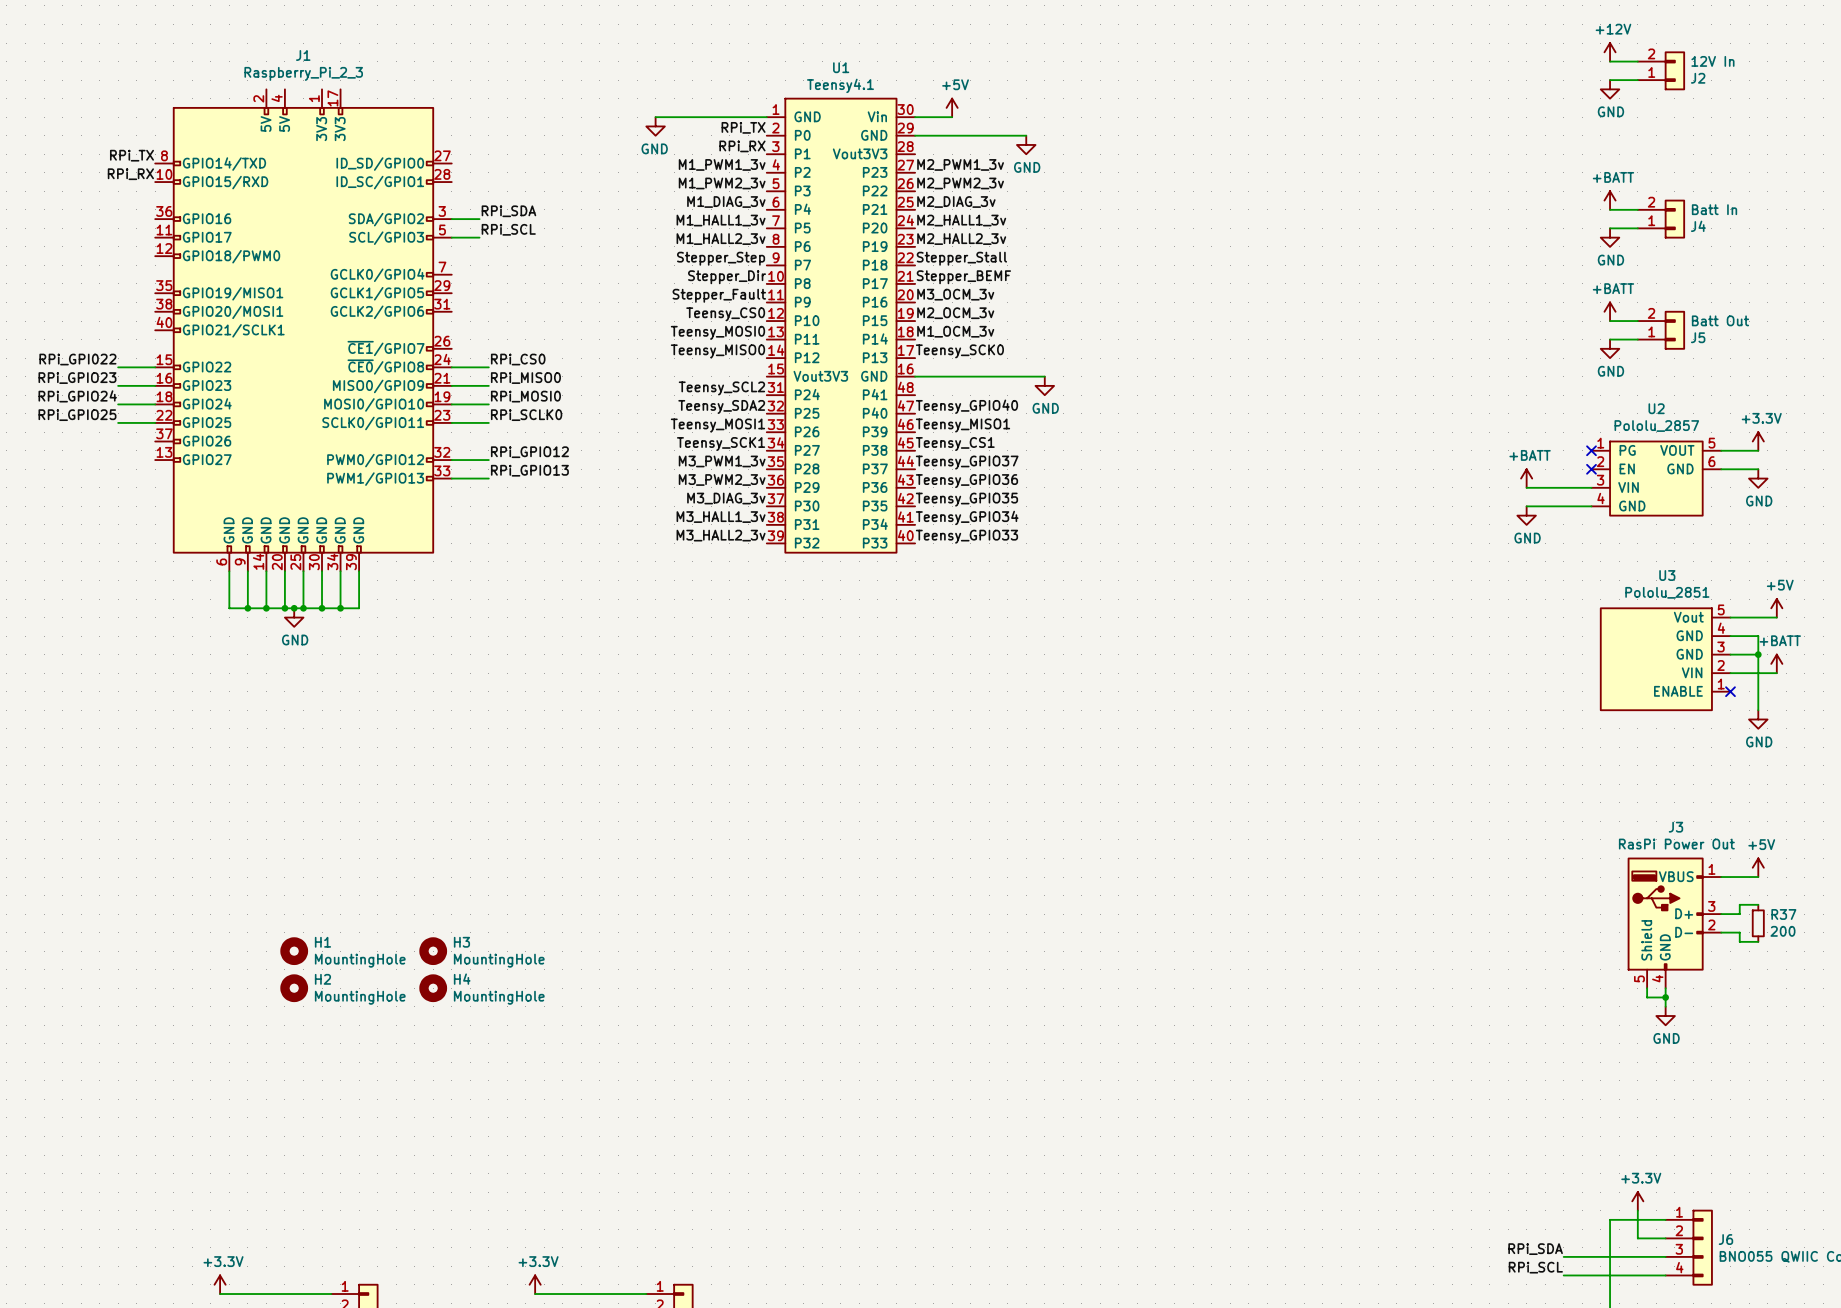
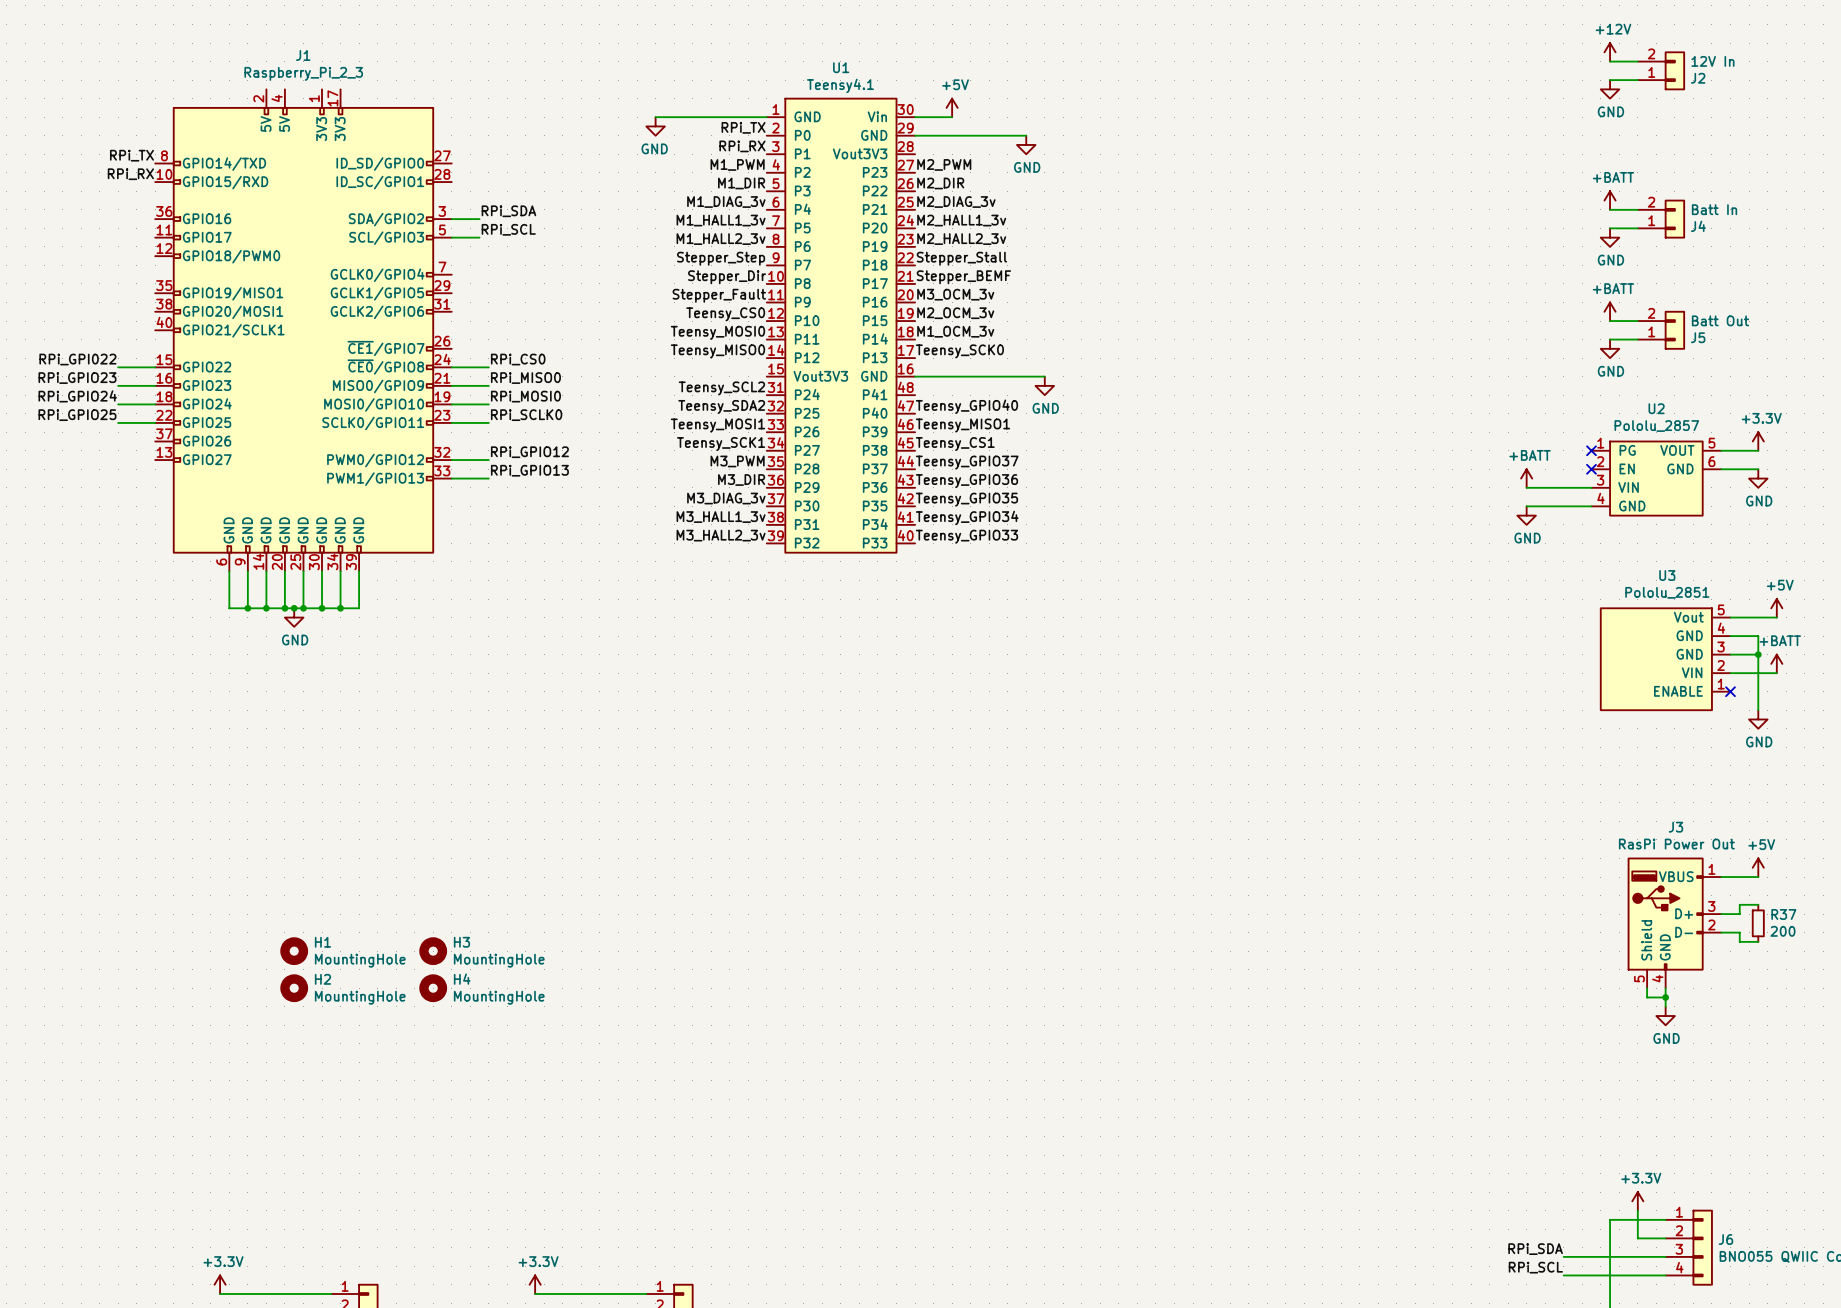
label: M1_PWM1_3v (722, 164) -> M1_PWM (737, 164)
label: M2_PWM1_3v (960, 164) -> M2_PWM (944, 164)
label: M1_PWM2_3v (722, 183) -> M1_DIR (741, 183)
label: M2_PWM2_3v (960, 183) -> M2_DIR (940, 183)
label: M3_PWM1_3v (722, 461) -> M3_PWM (737, 461)
label: M3_PWM2_3v (722, 480) -> M3_DIR (741, 480)

